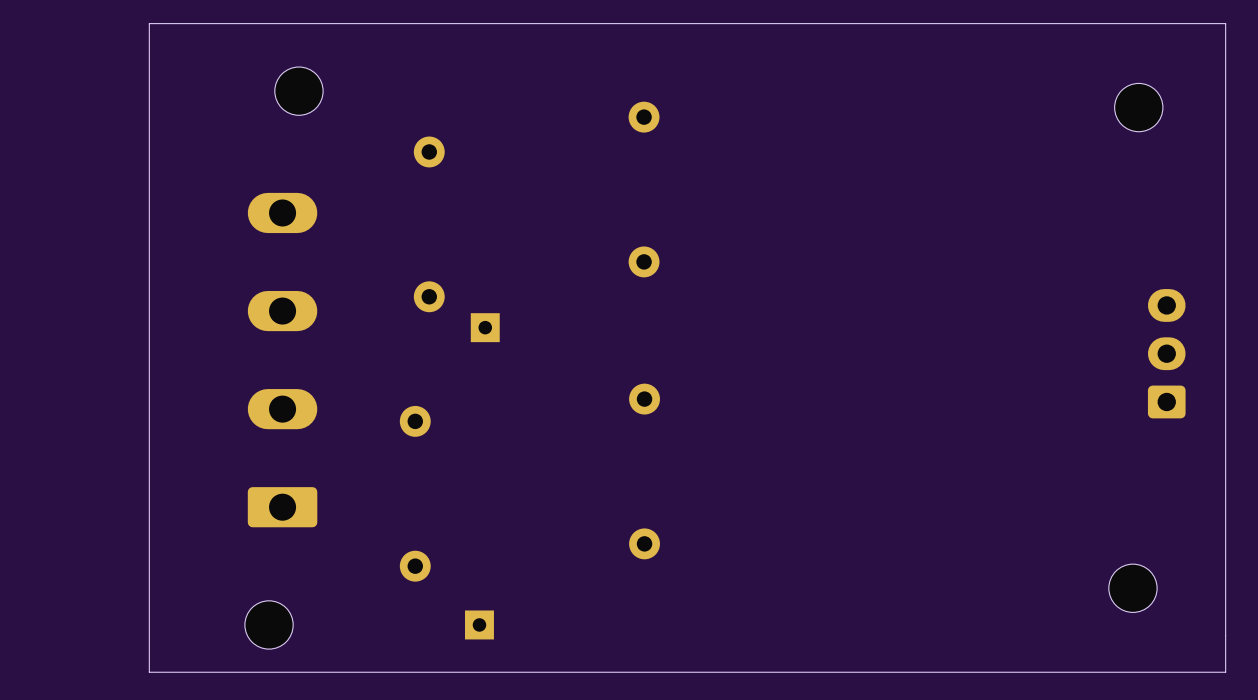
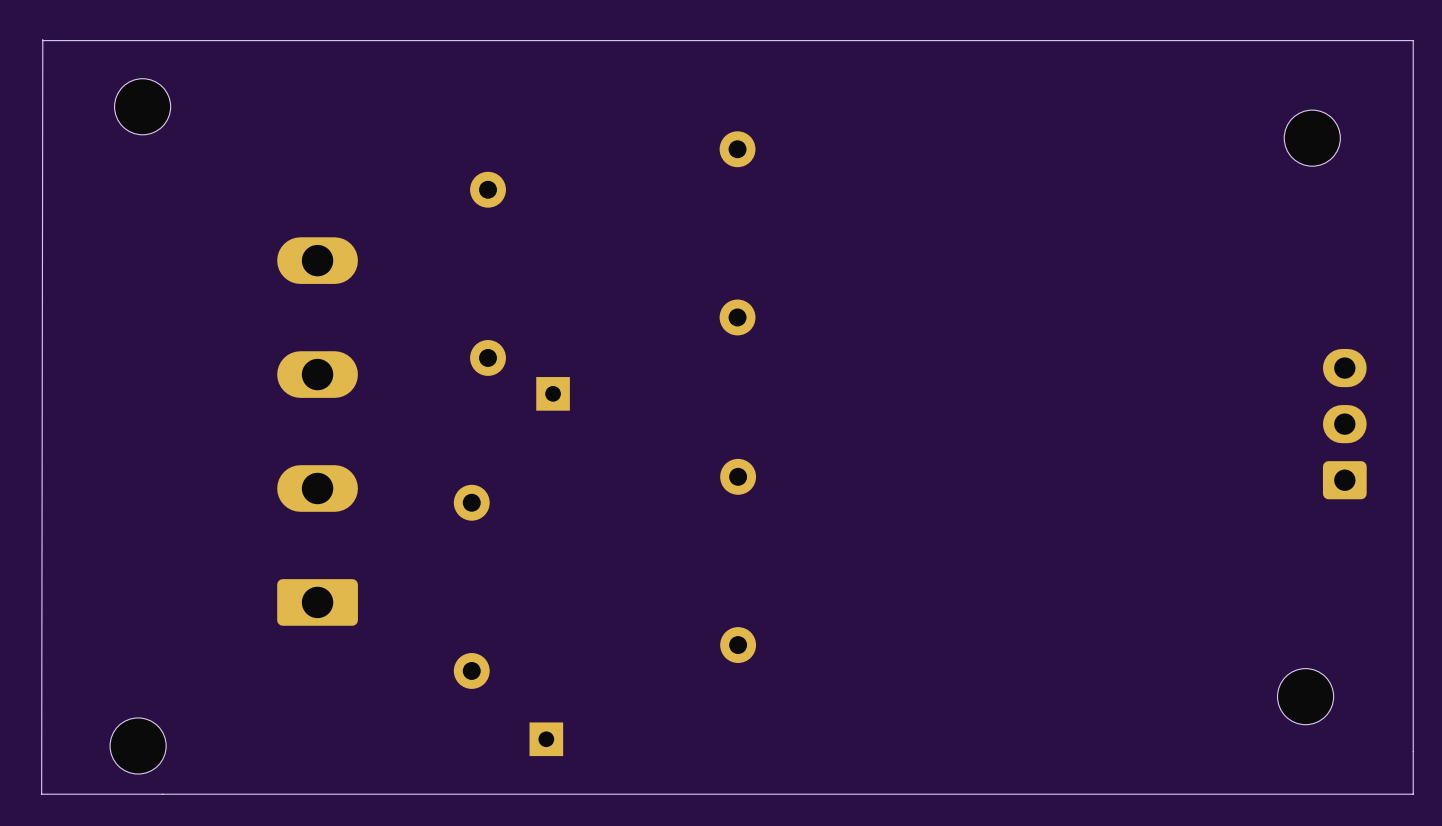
board edge: (149, 23) (149, 672) -> (42, 39) (41, 794) (162, 794)
board edge: none -> (162, 40) (42, 40)
part position: (298, 91) -> (142, 106)
part position: (269, 624) -> (138, 745)

